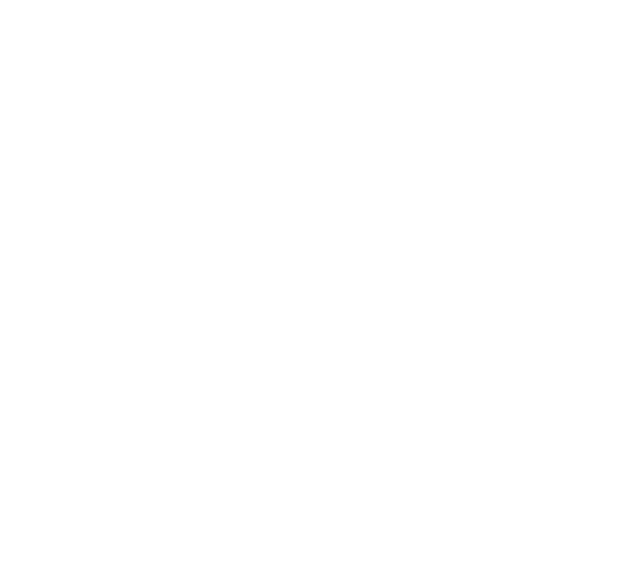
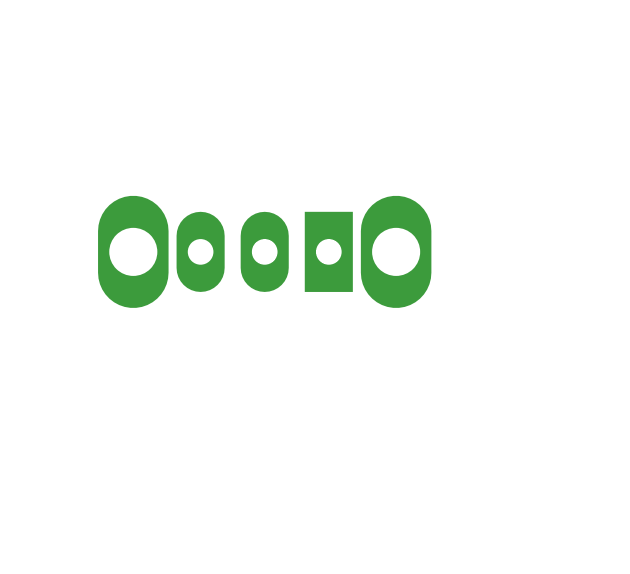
part: none -> (264, 251)

